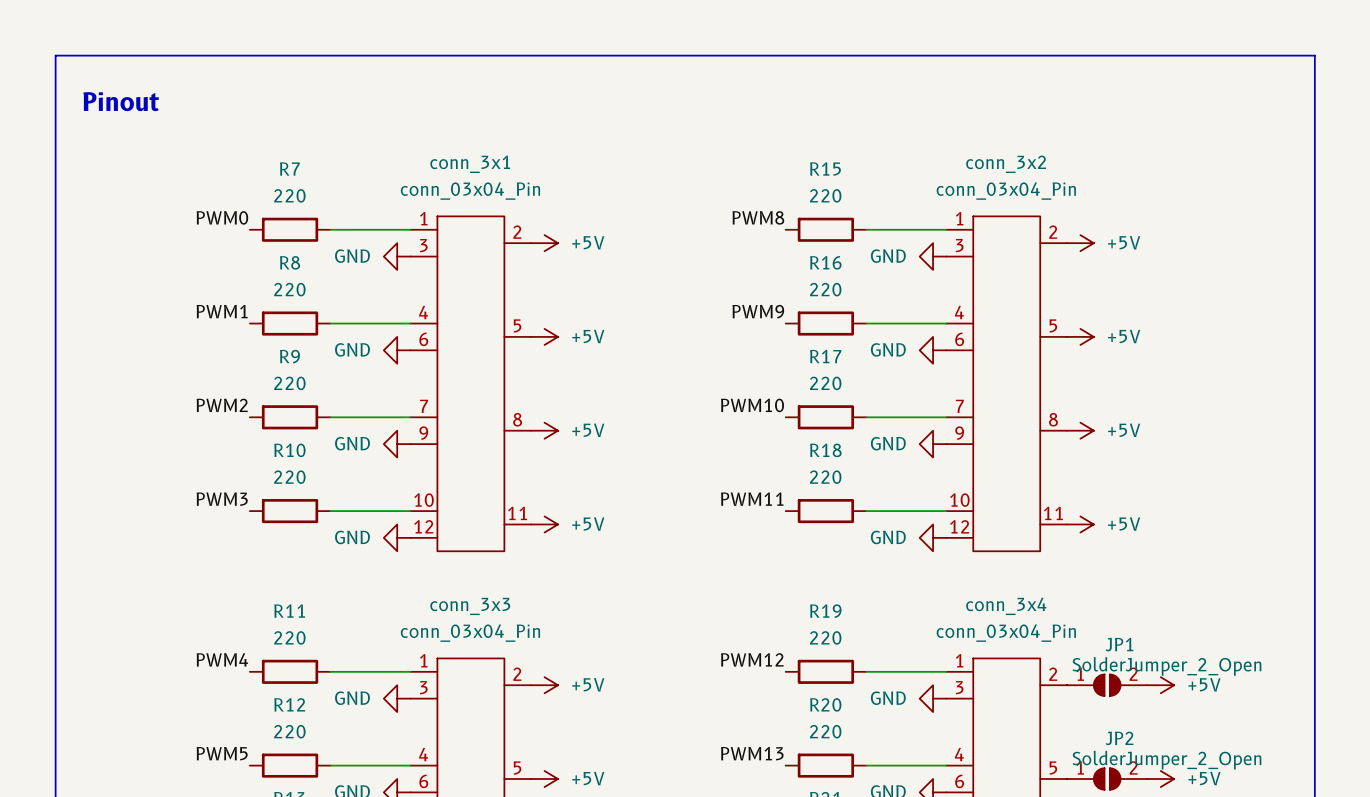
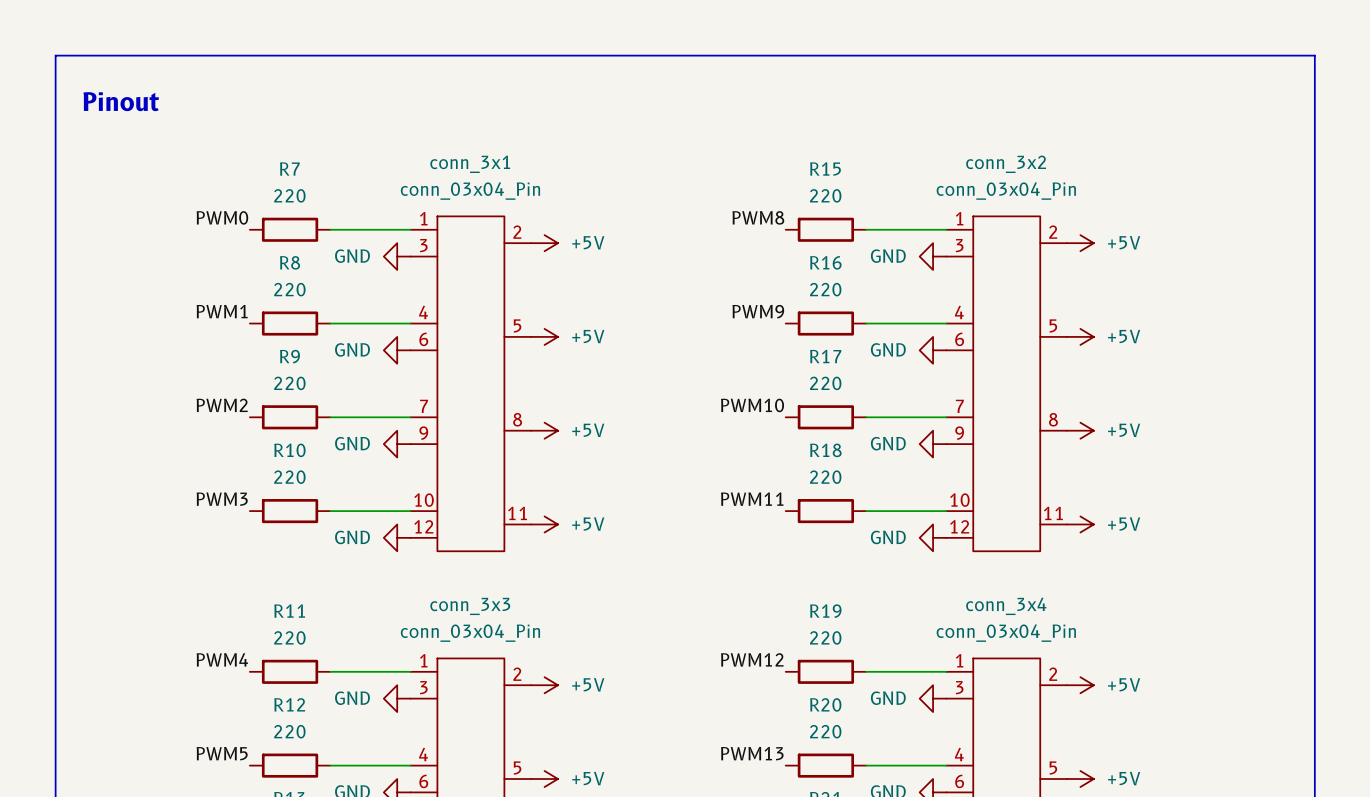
power symbol: none -> +5V (1080, 685)
JP1: SolderJumper_2_Open (1107, 685) -> none
power symbol: +5V (1160, 685) -> none
power symbol: none -> +5V (1080, 779)
JP2: SolderJumper_2_Open (1107, 779) -> none
power symbol: +5V (1160, 779) -> none

